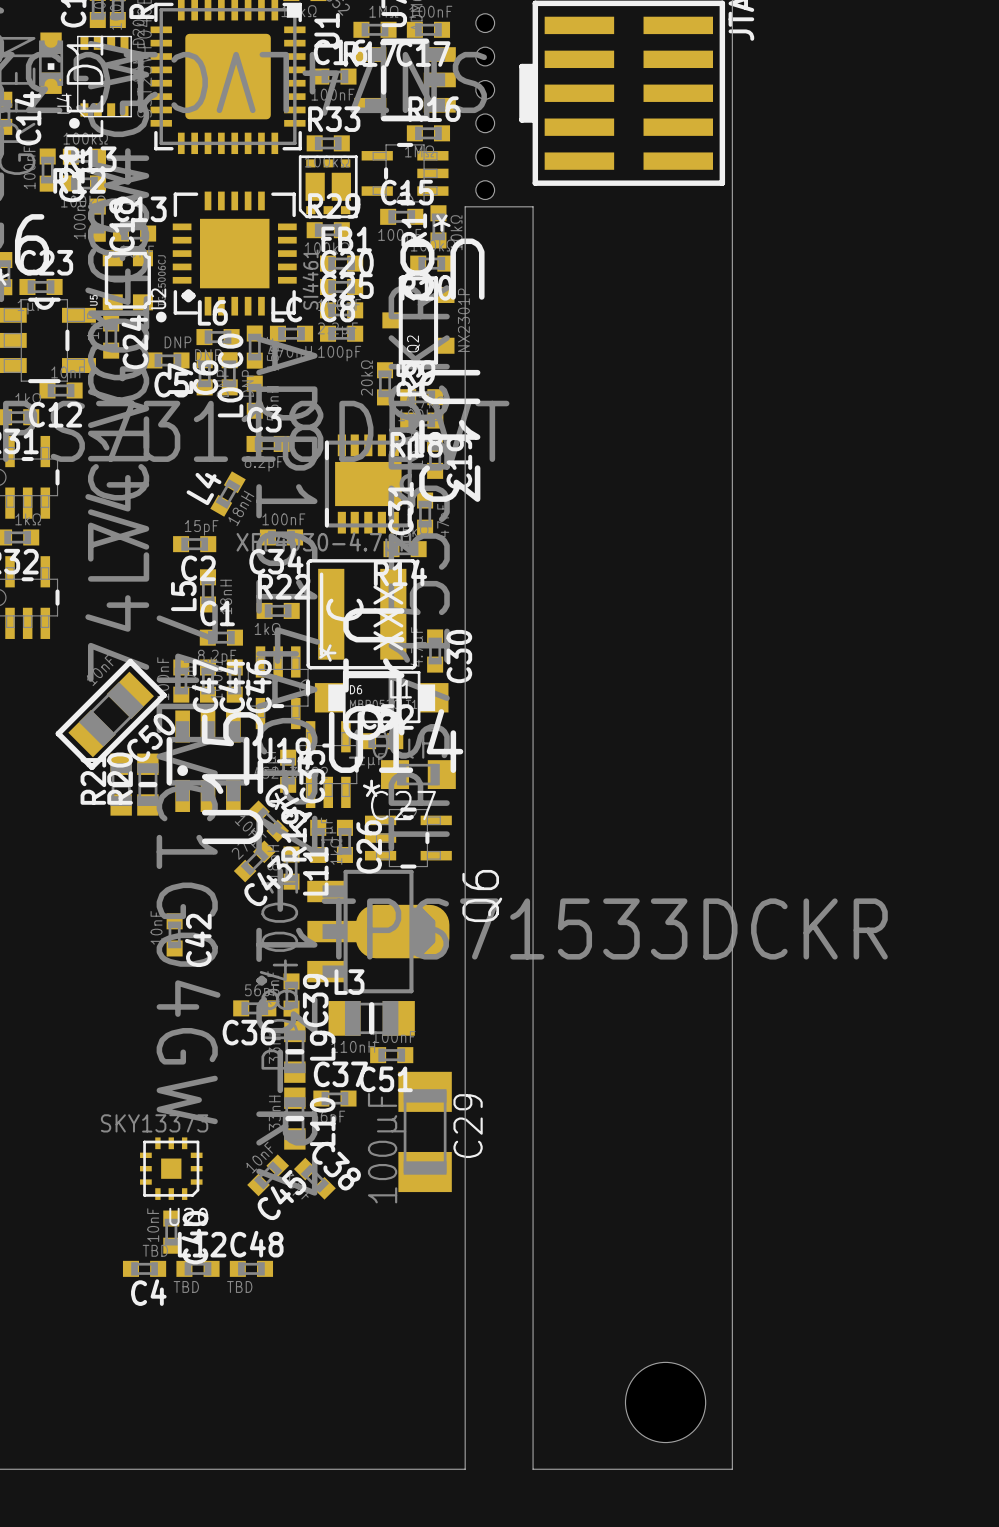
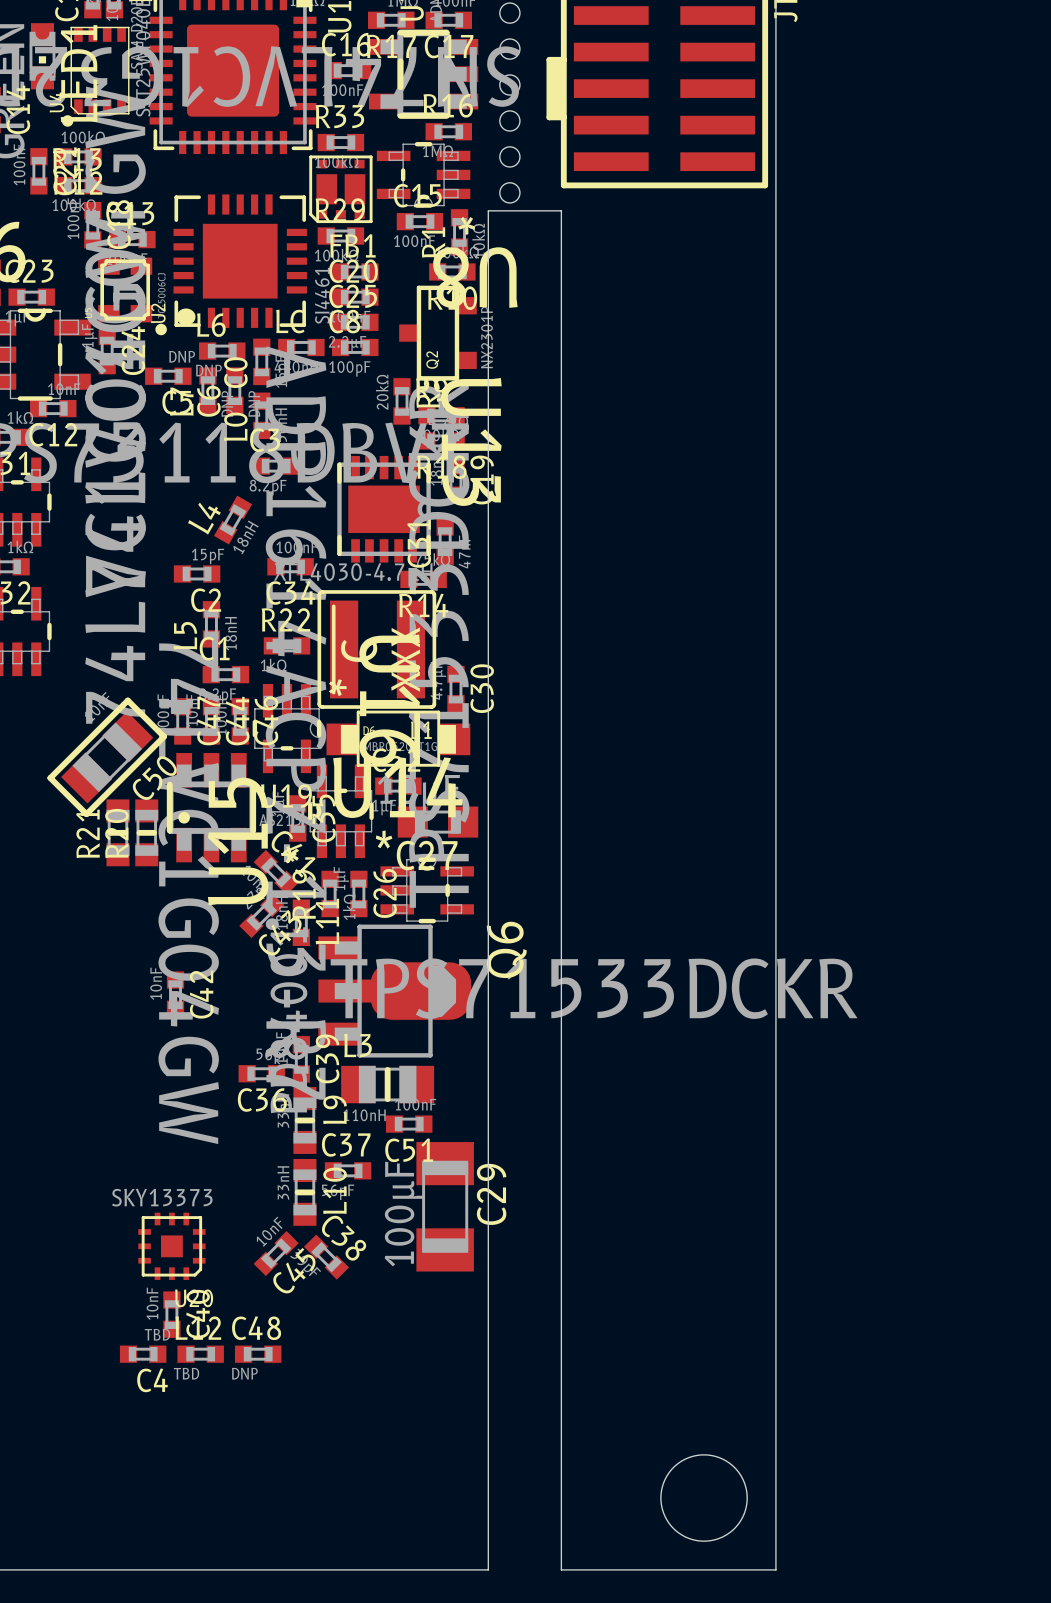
C48 value: TBD (239, 1286) -> DNP (244, 1373)

